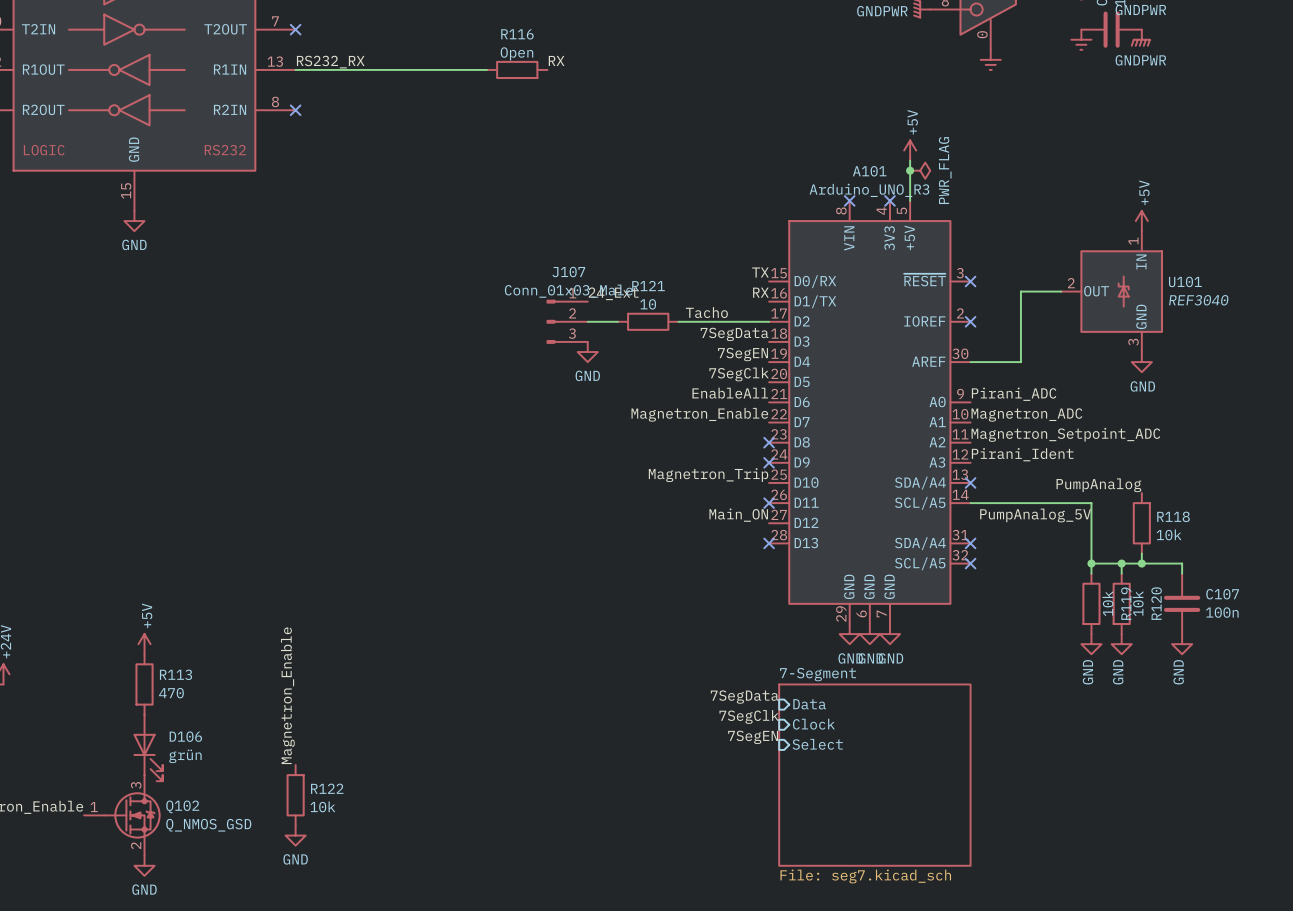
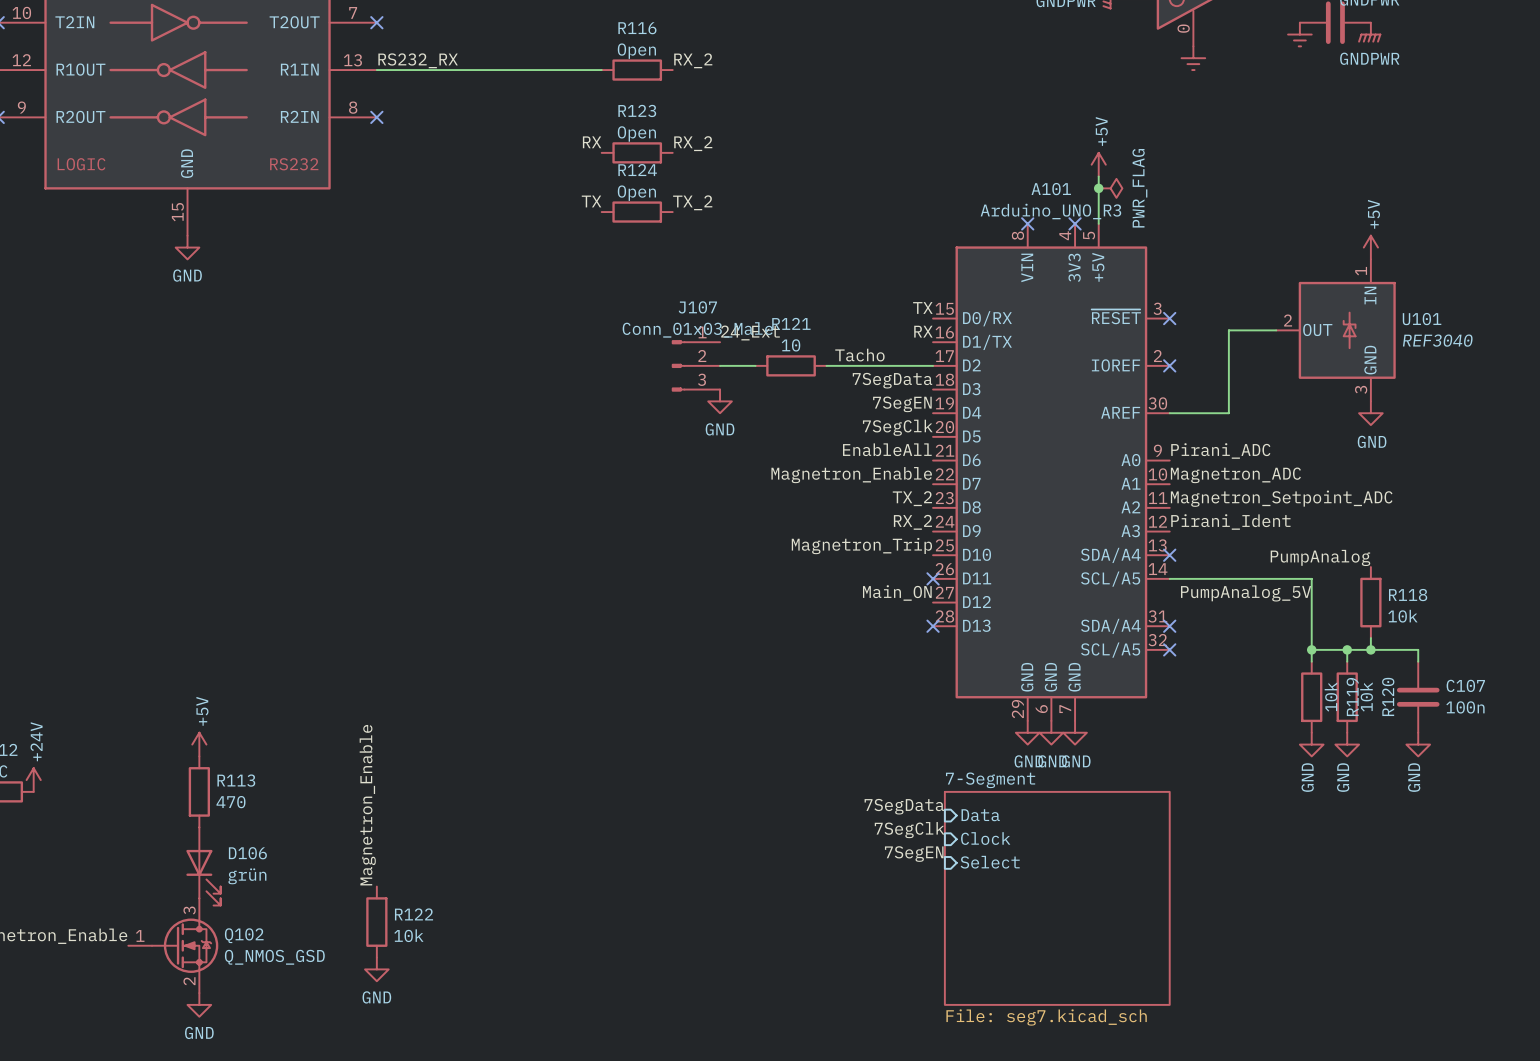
label: RX (556, 60) -> RX_2 (693, 60)
label: none -> RX (592, 142)
label: none -> RX_2 (693, 143)
R123: none -> Open (637, 152)
label: none -> TX (591, 201)
label: none -> TX_2 (692, 202)
R124: none -> Open (637, 212)
label: none -> TX_2 (912, 498)
no-connect mark: (769, 442) -> none
label: none -> RX_2 (912, 522)
no-connect mark: (769, 462) -> none

